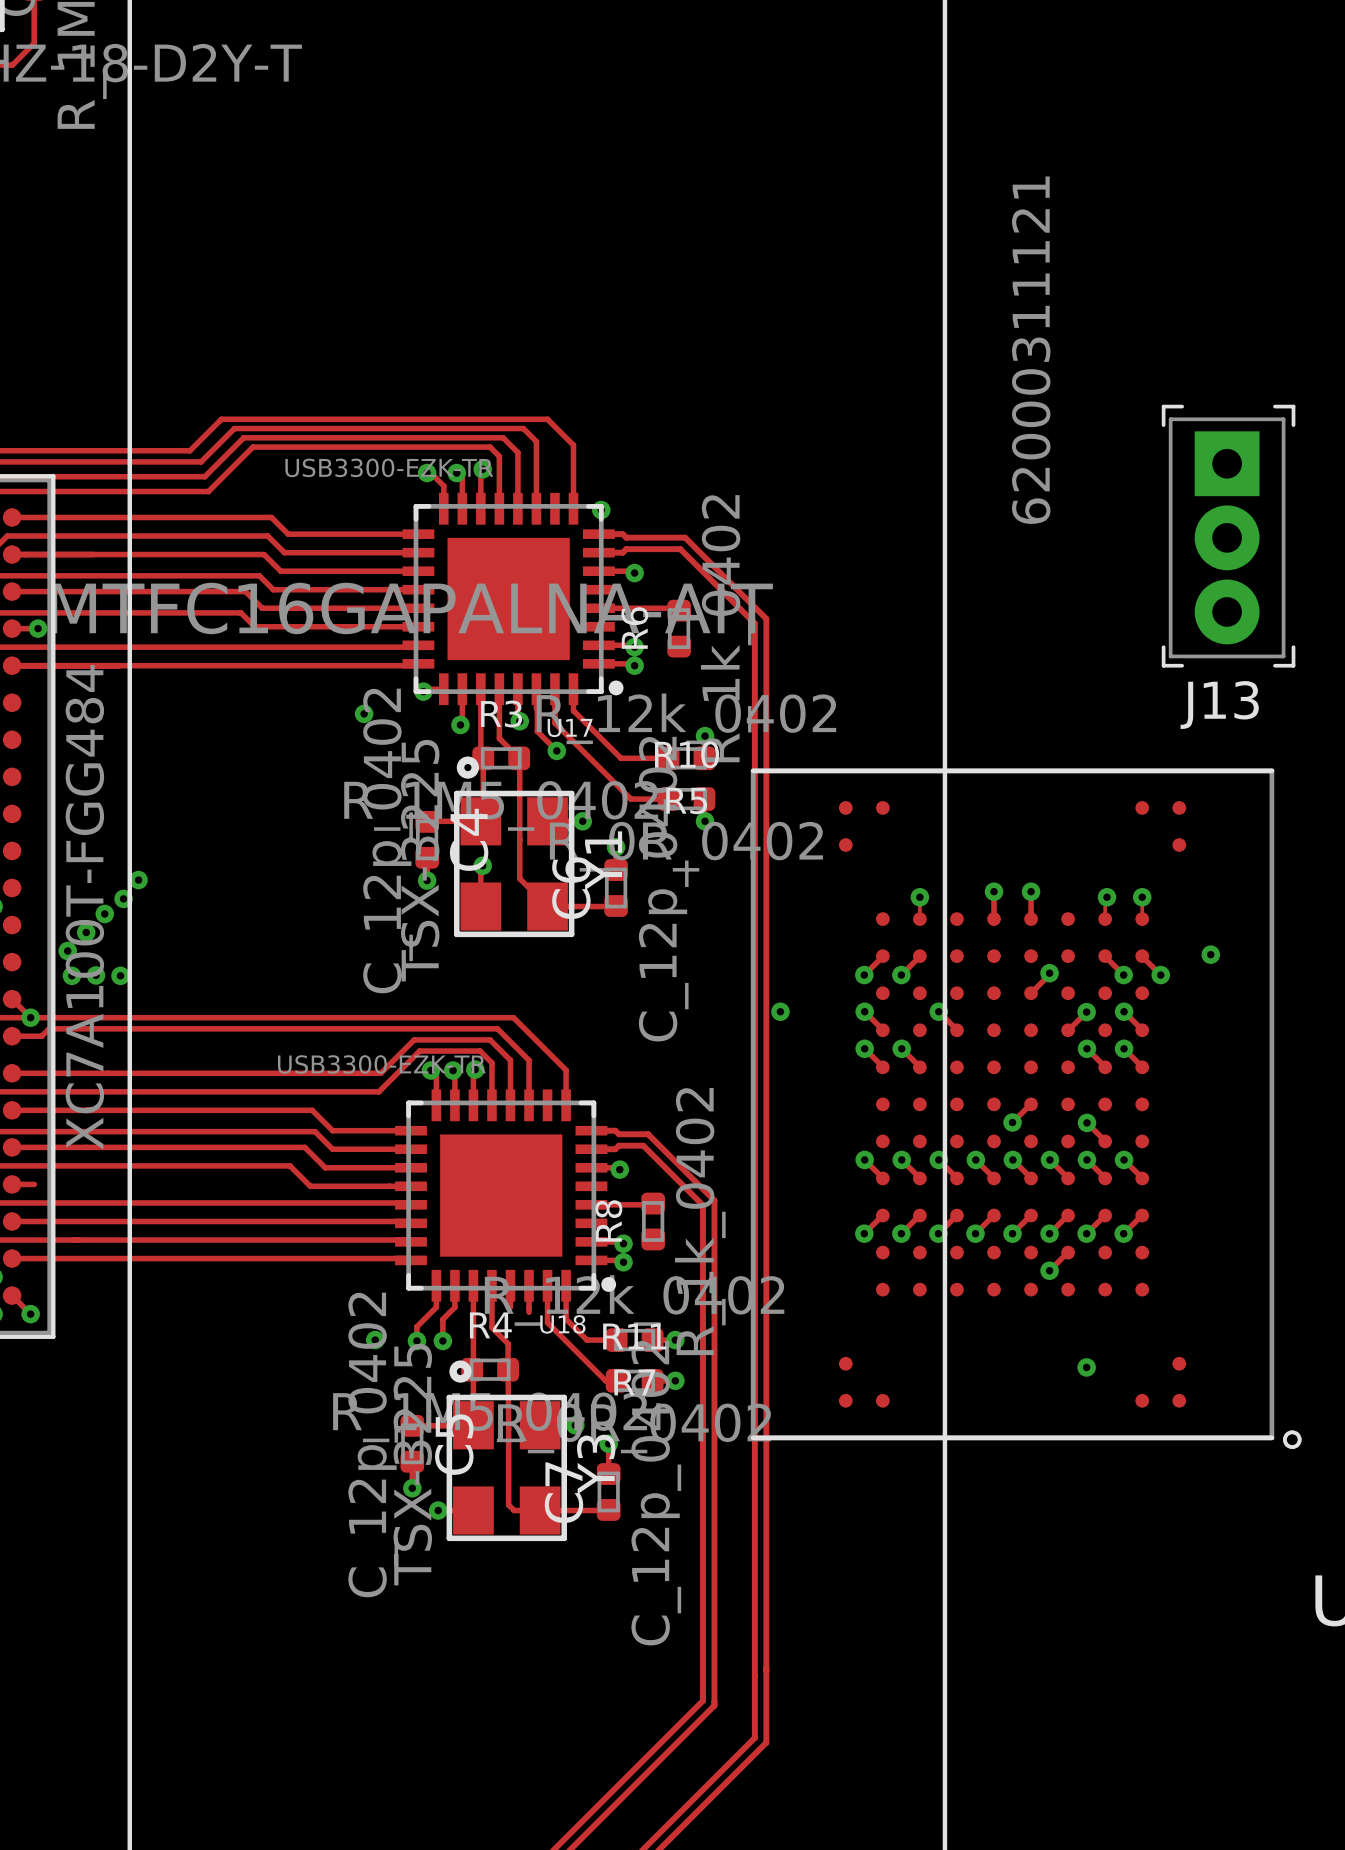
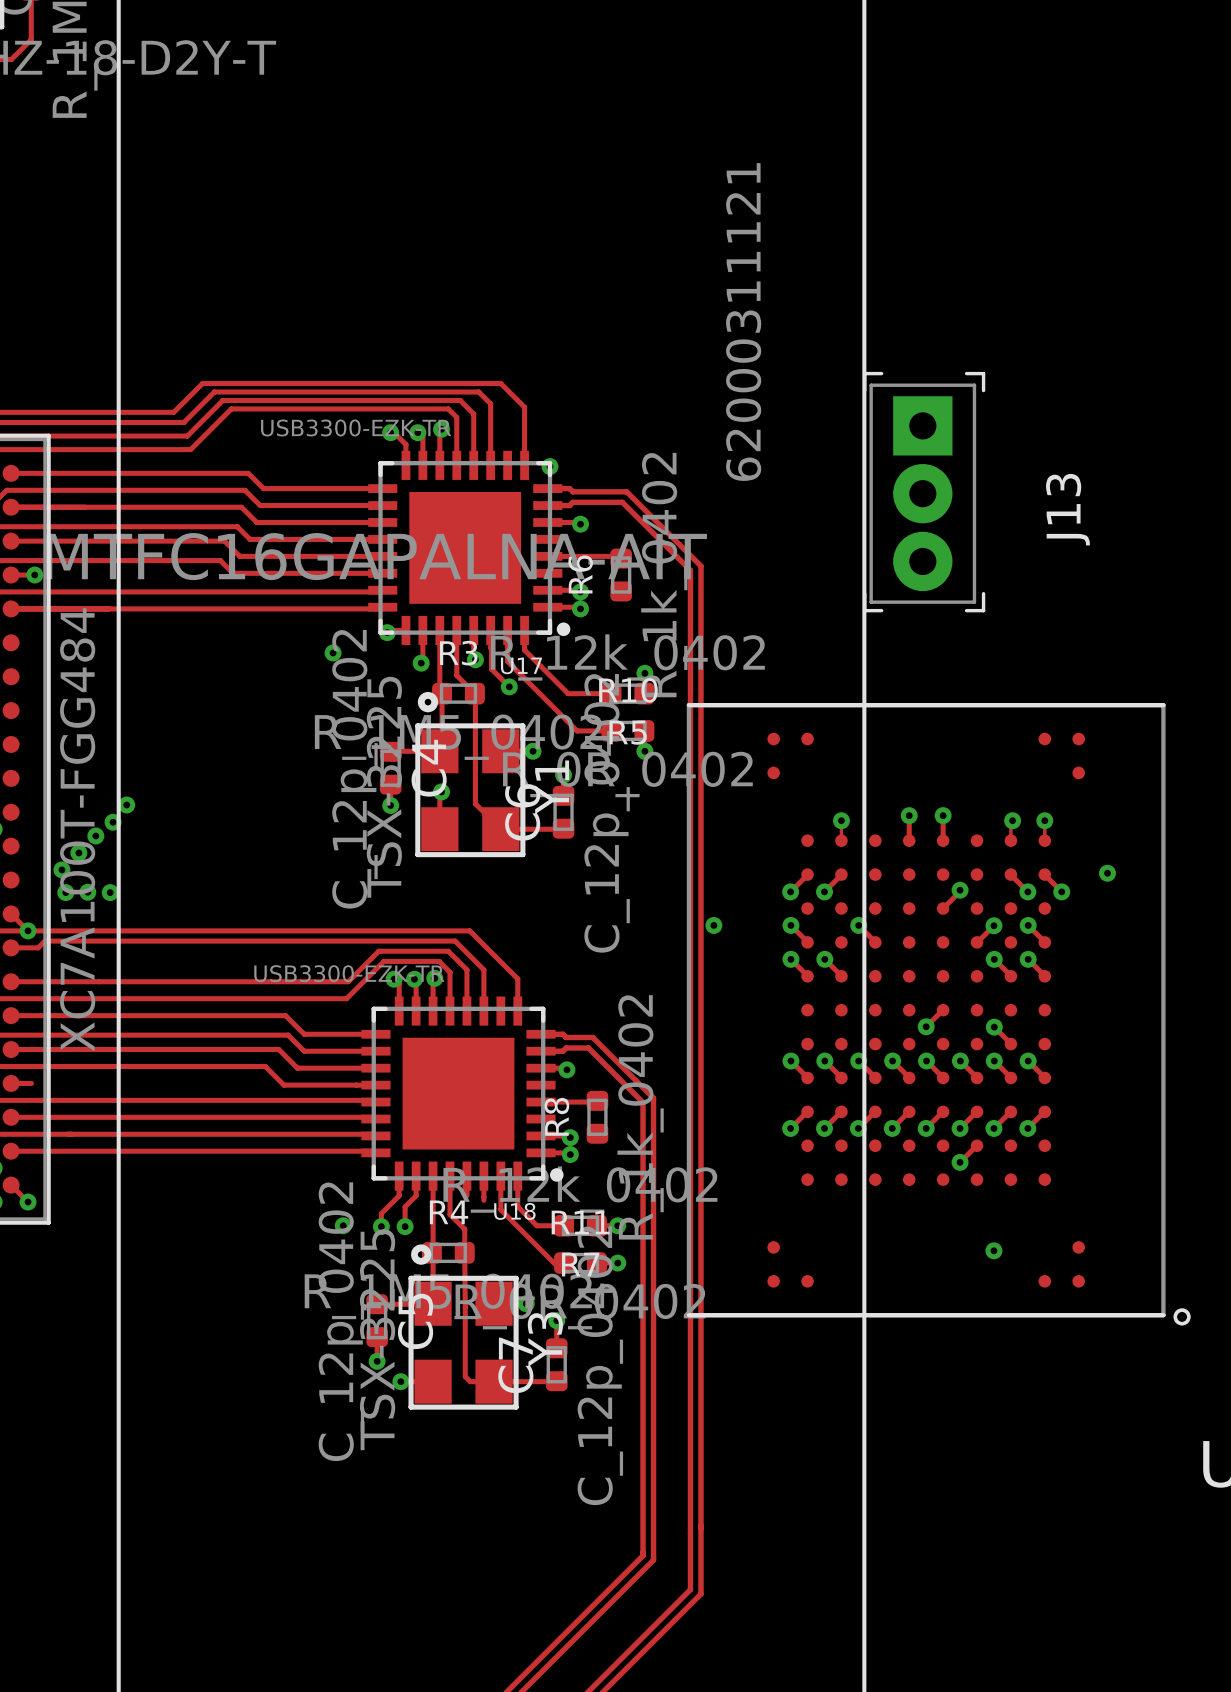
J13 position: (1228, 536) -> (924, 492)
J13 name rotation: 0° (1219, 705) -> 90° counterclockwise (1067, 509)
J13 name position: J13 (1219, 705) -> J13 (1067, 509)

